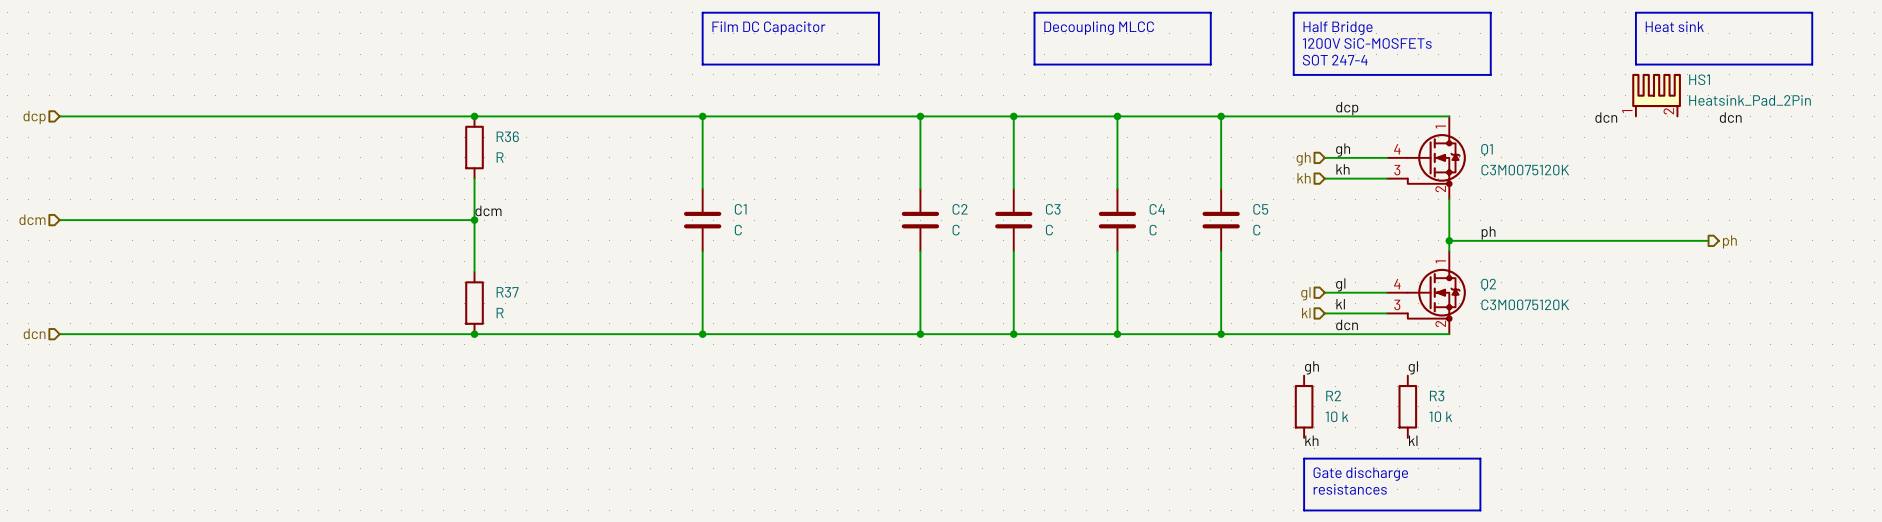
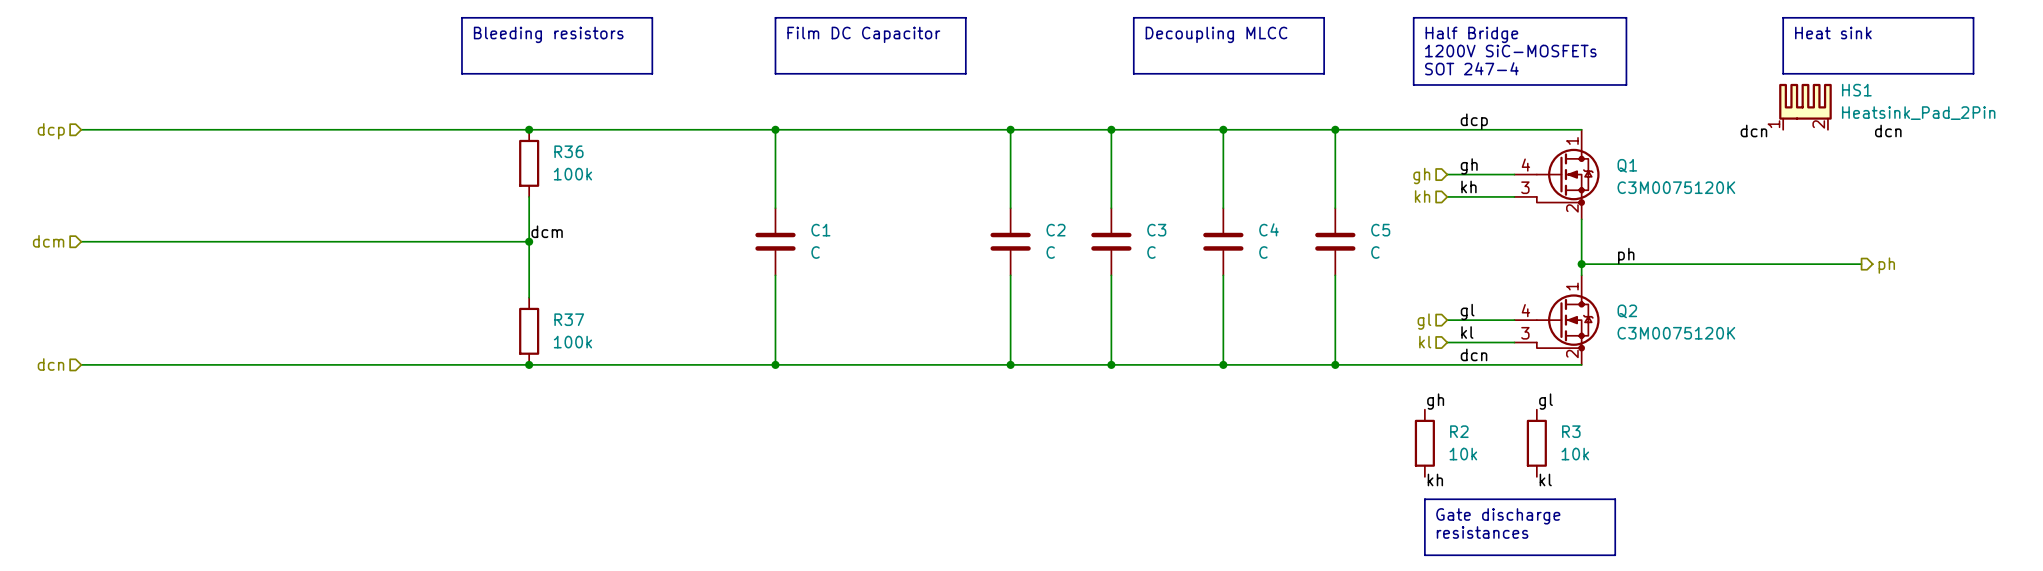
line: none -> (461, 17) (652, 17) (652, 73) (461, 73) (461, 17)
text: none -> Bleeding resistors (548, 34)
R36 value: R (500, 157) -> 100k (572, 174)
R37 value: R (500, 313) -> 100k (572, 342)
R2 value: 10 k (1337, 416) -> 10k (1463, 454)
R3 value: 10 k (1440, 416) -> 10k (1575, 454)

